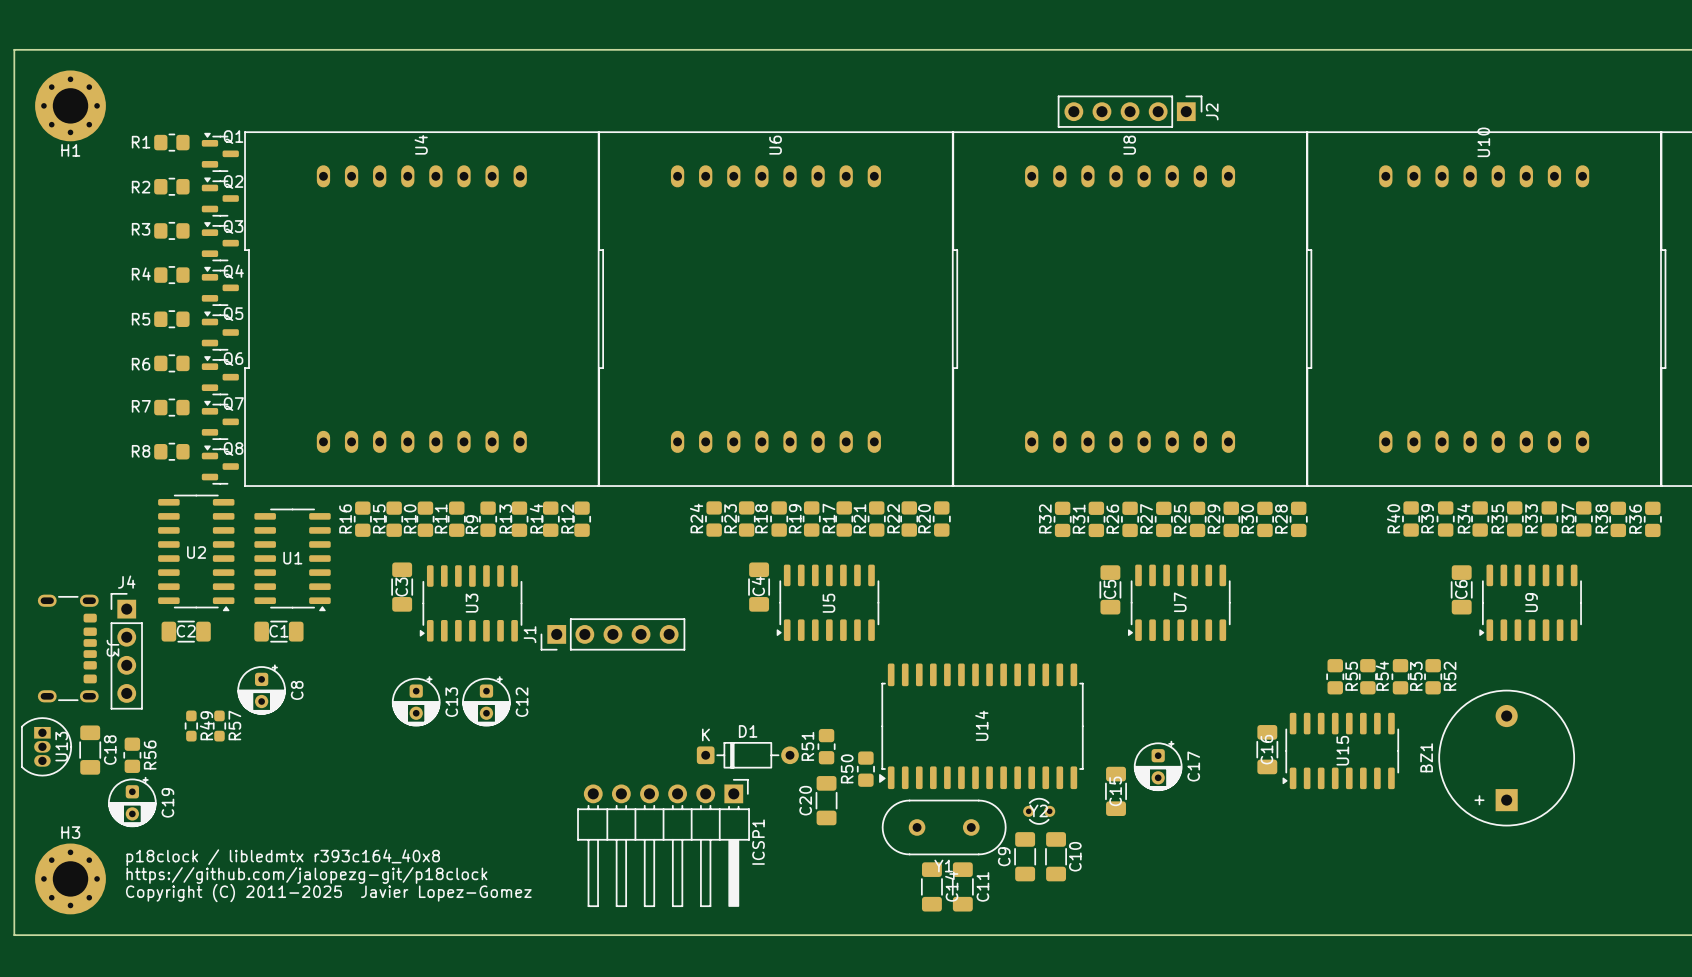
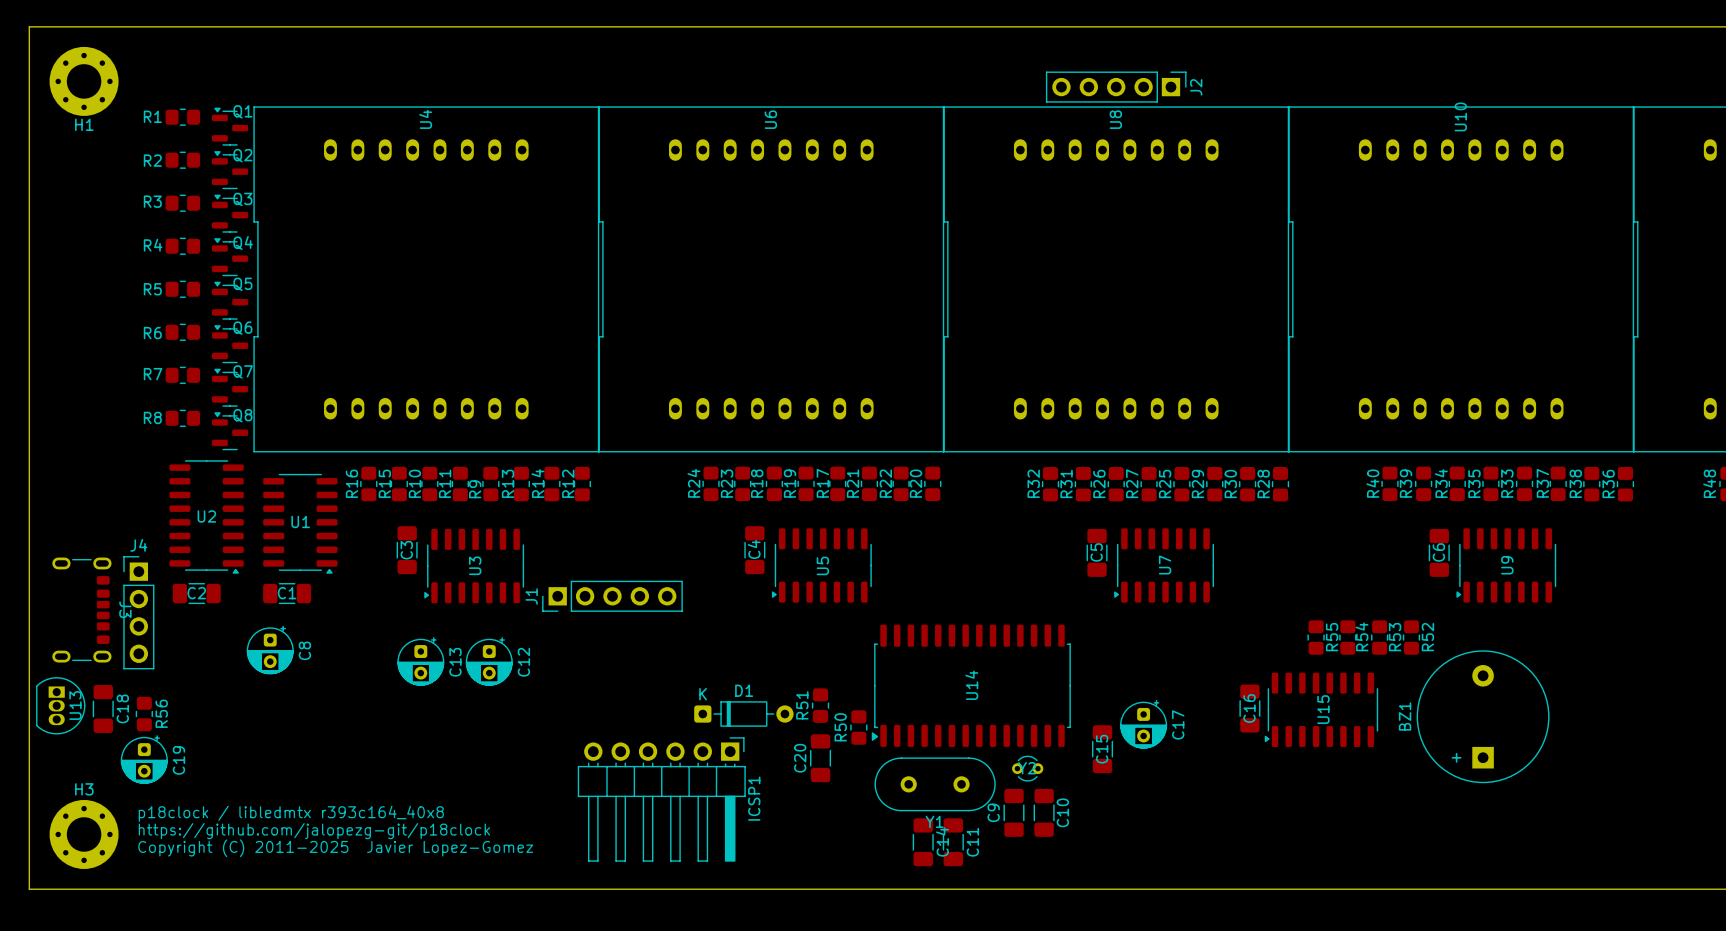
R49: (191, 726) -> none
R57: (219, 726) -> none

